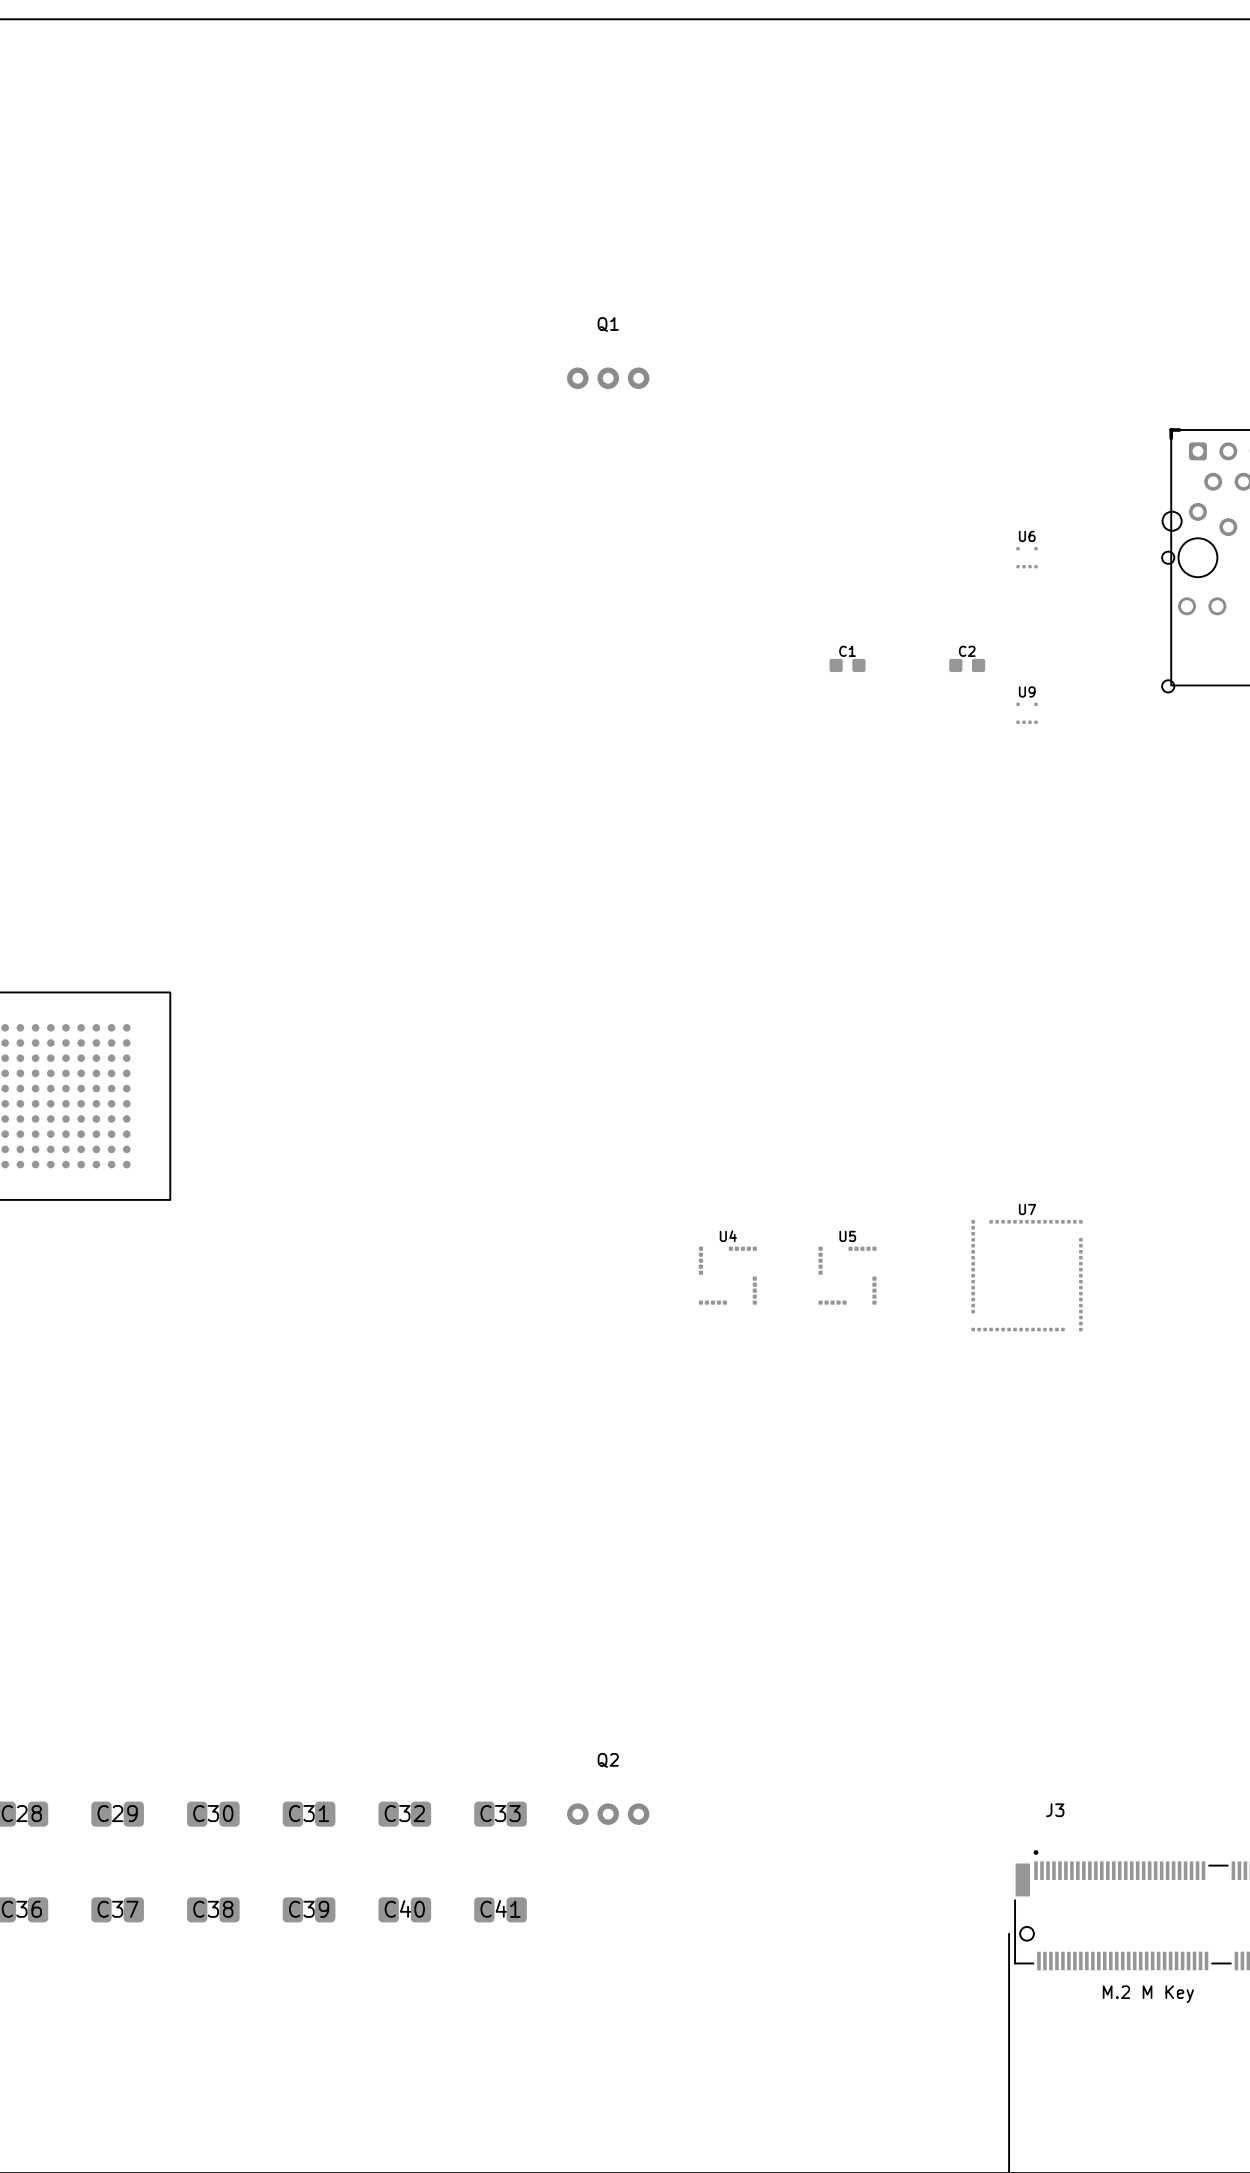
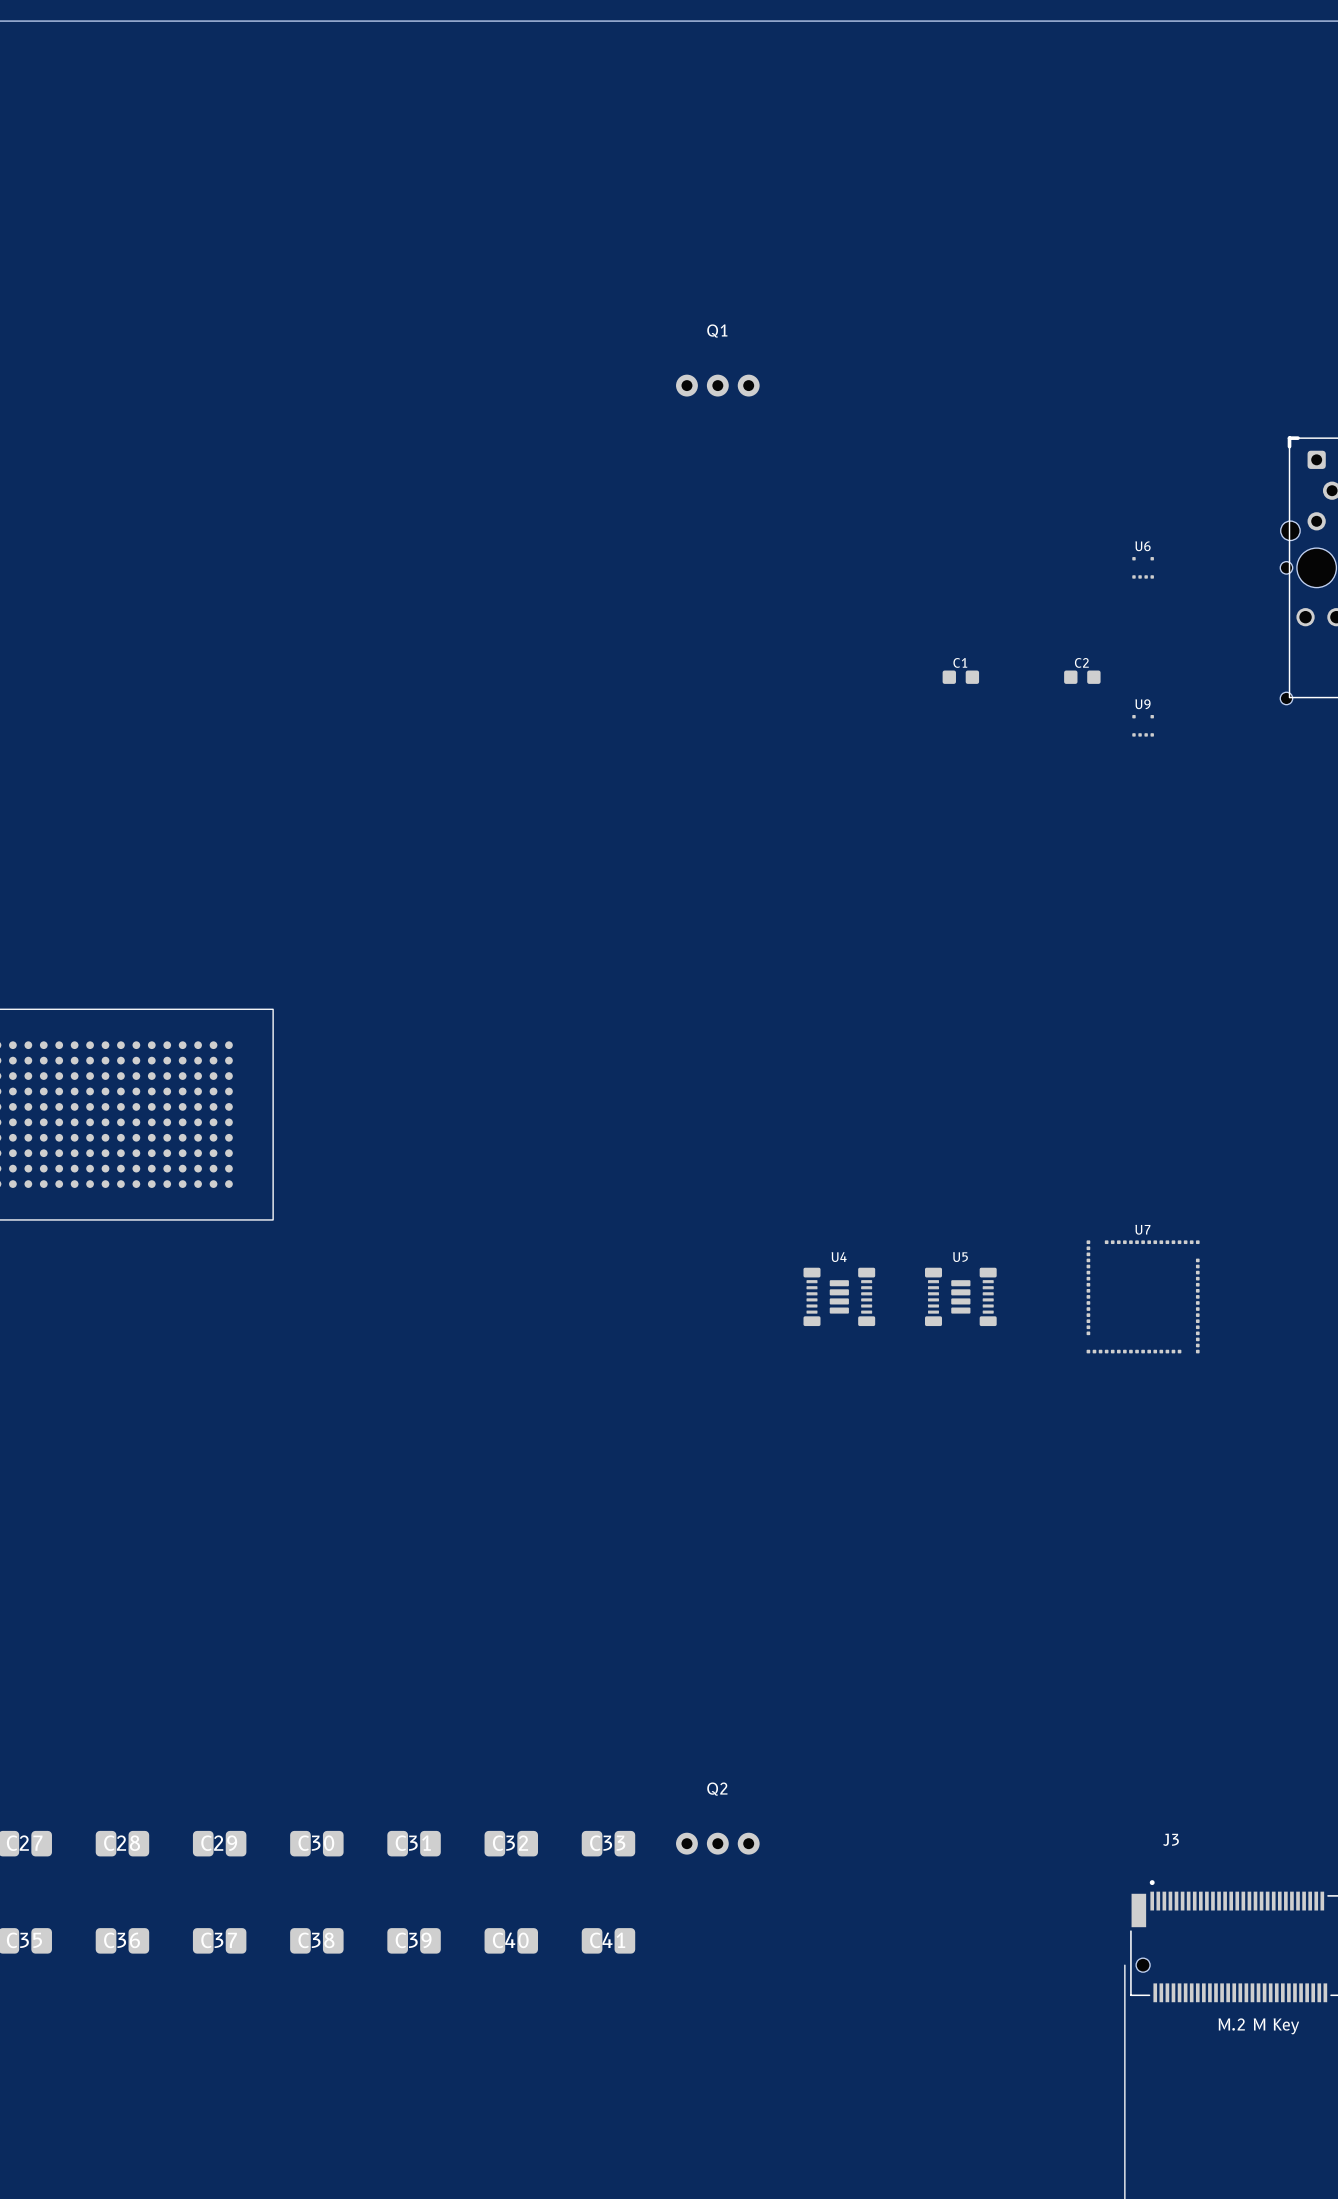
U4 footprint: [698, 1246, 757, 1305] -> [803, 1267, 876, 1327]
U5 footprint: [818, 1246, 877, 1305] -> [924, 1267, 997, 1327]

